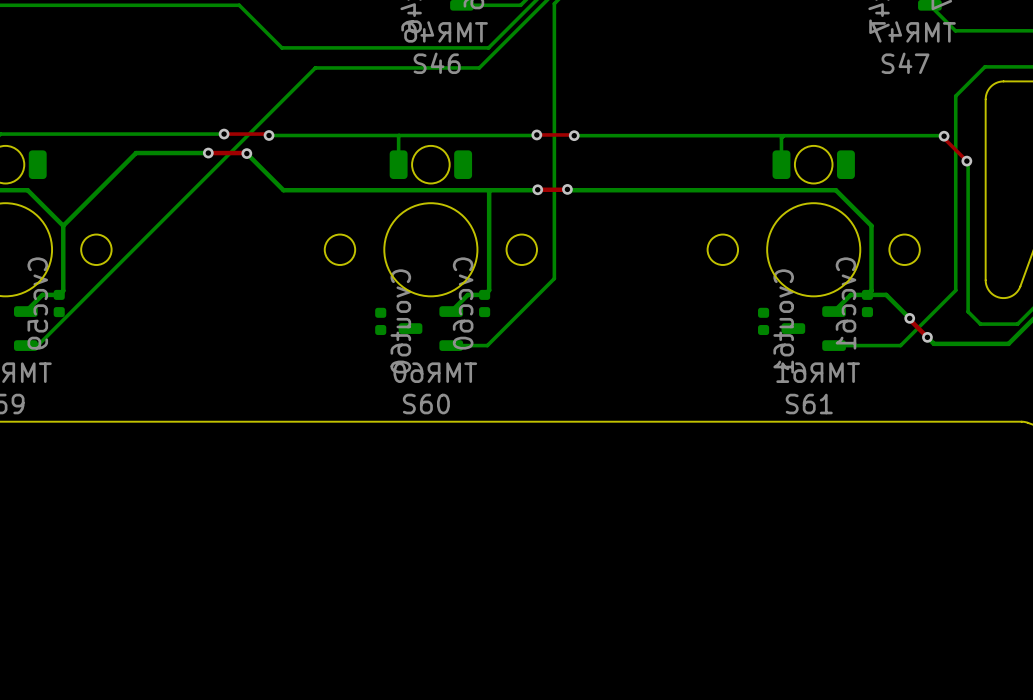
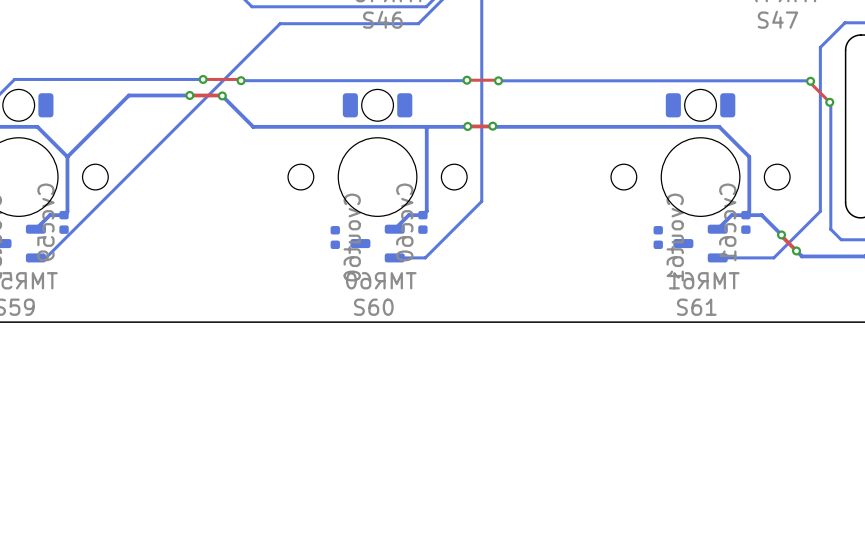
bottom track: (399, 135) (398, 164) -> none
bottom track: (783, 135) (781, 138) (781, 164) -> none

